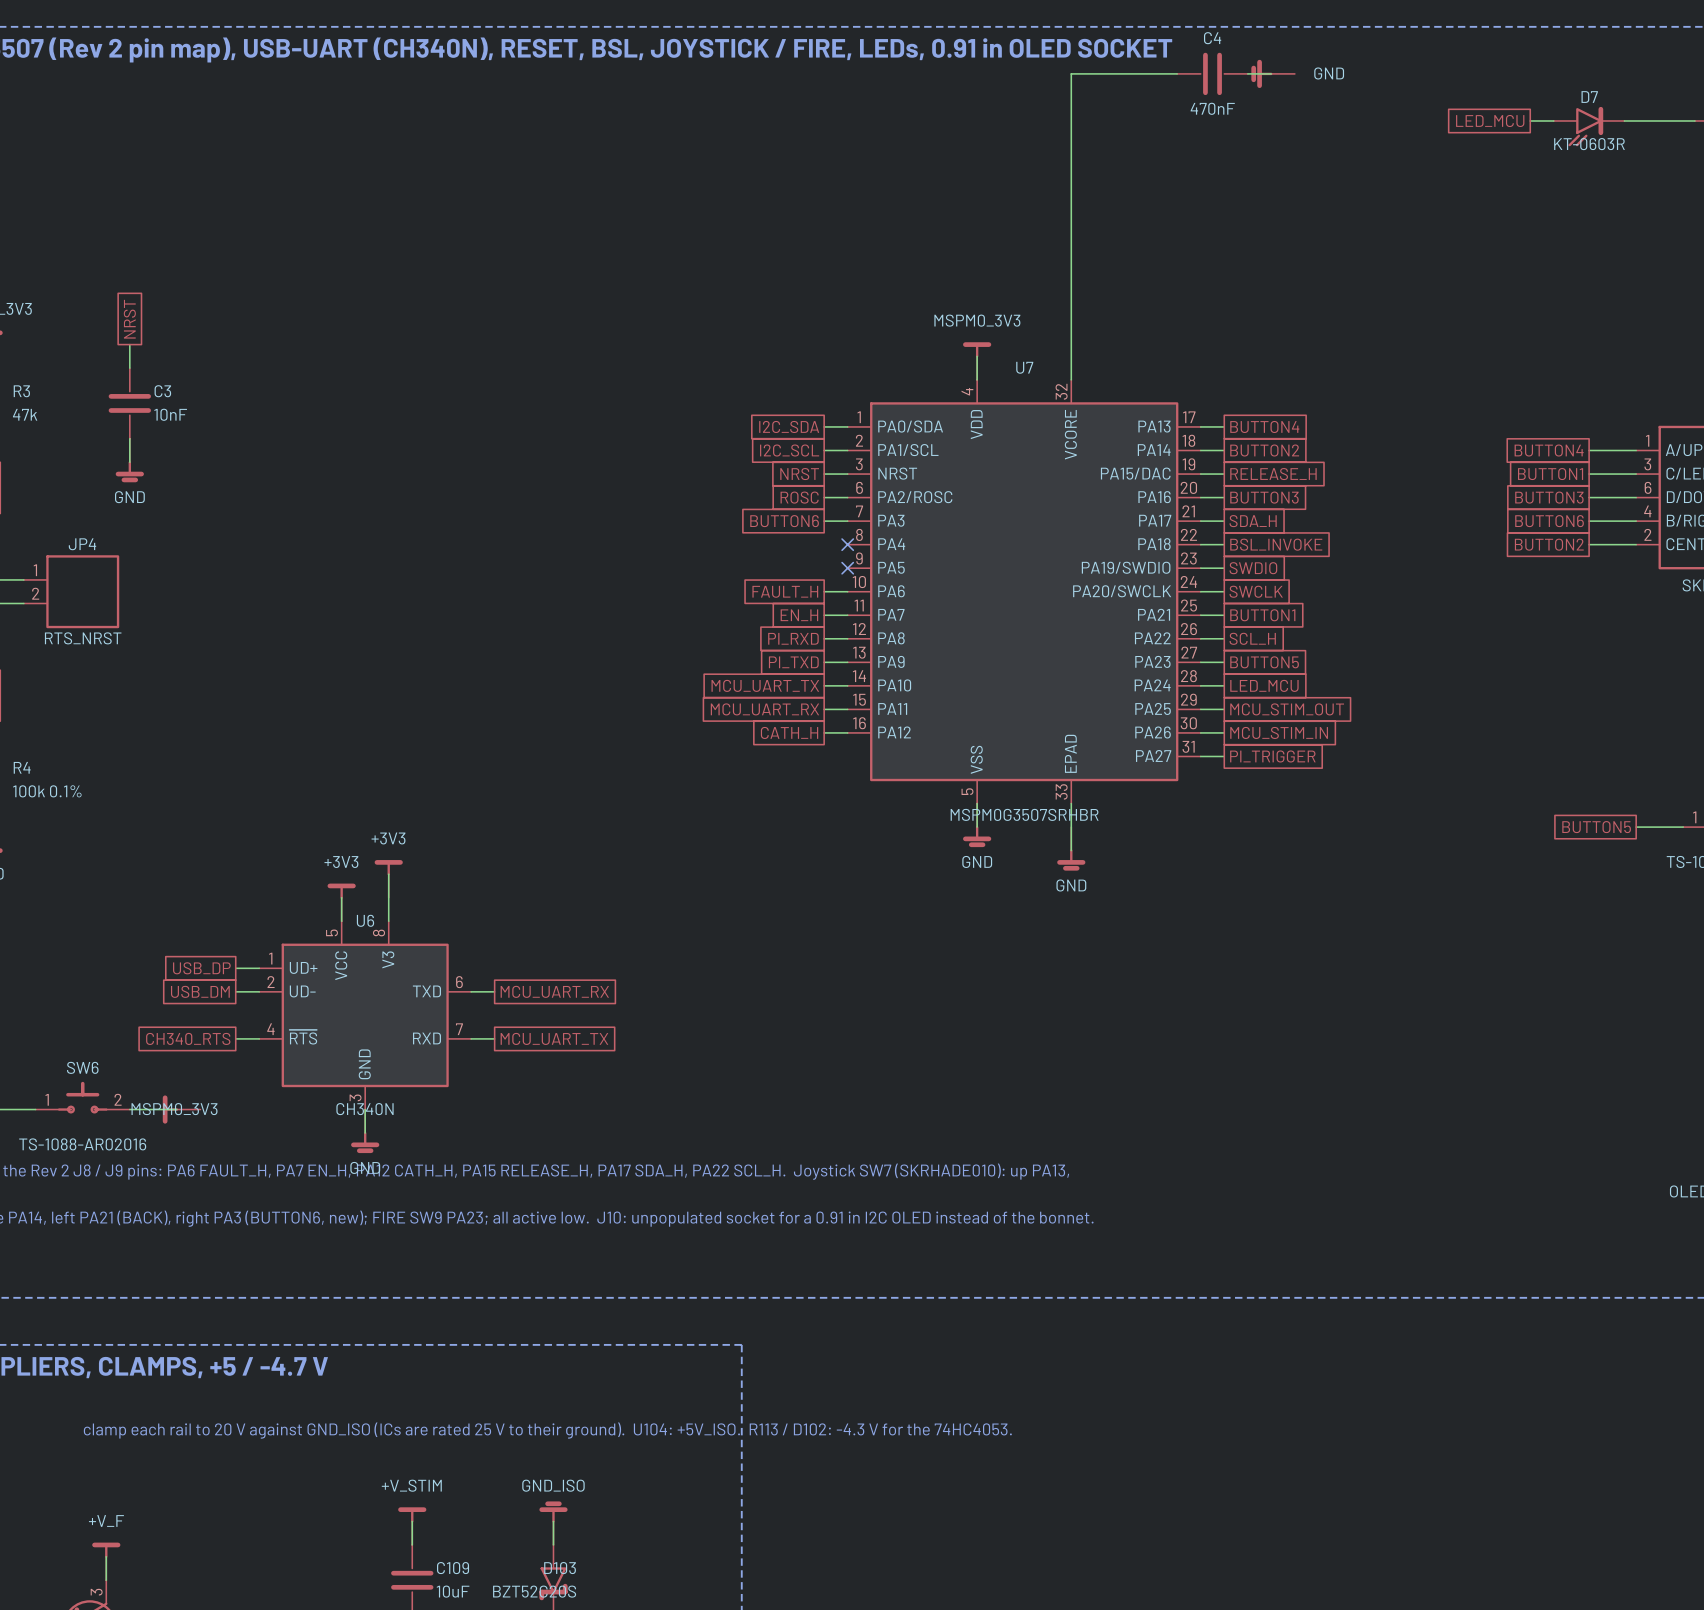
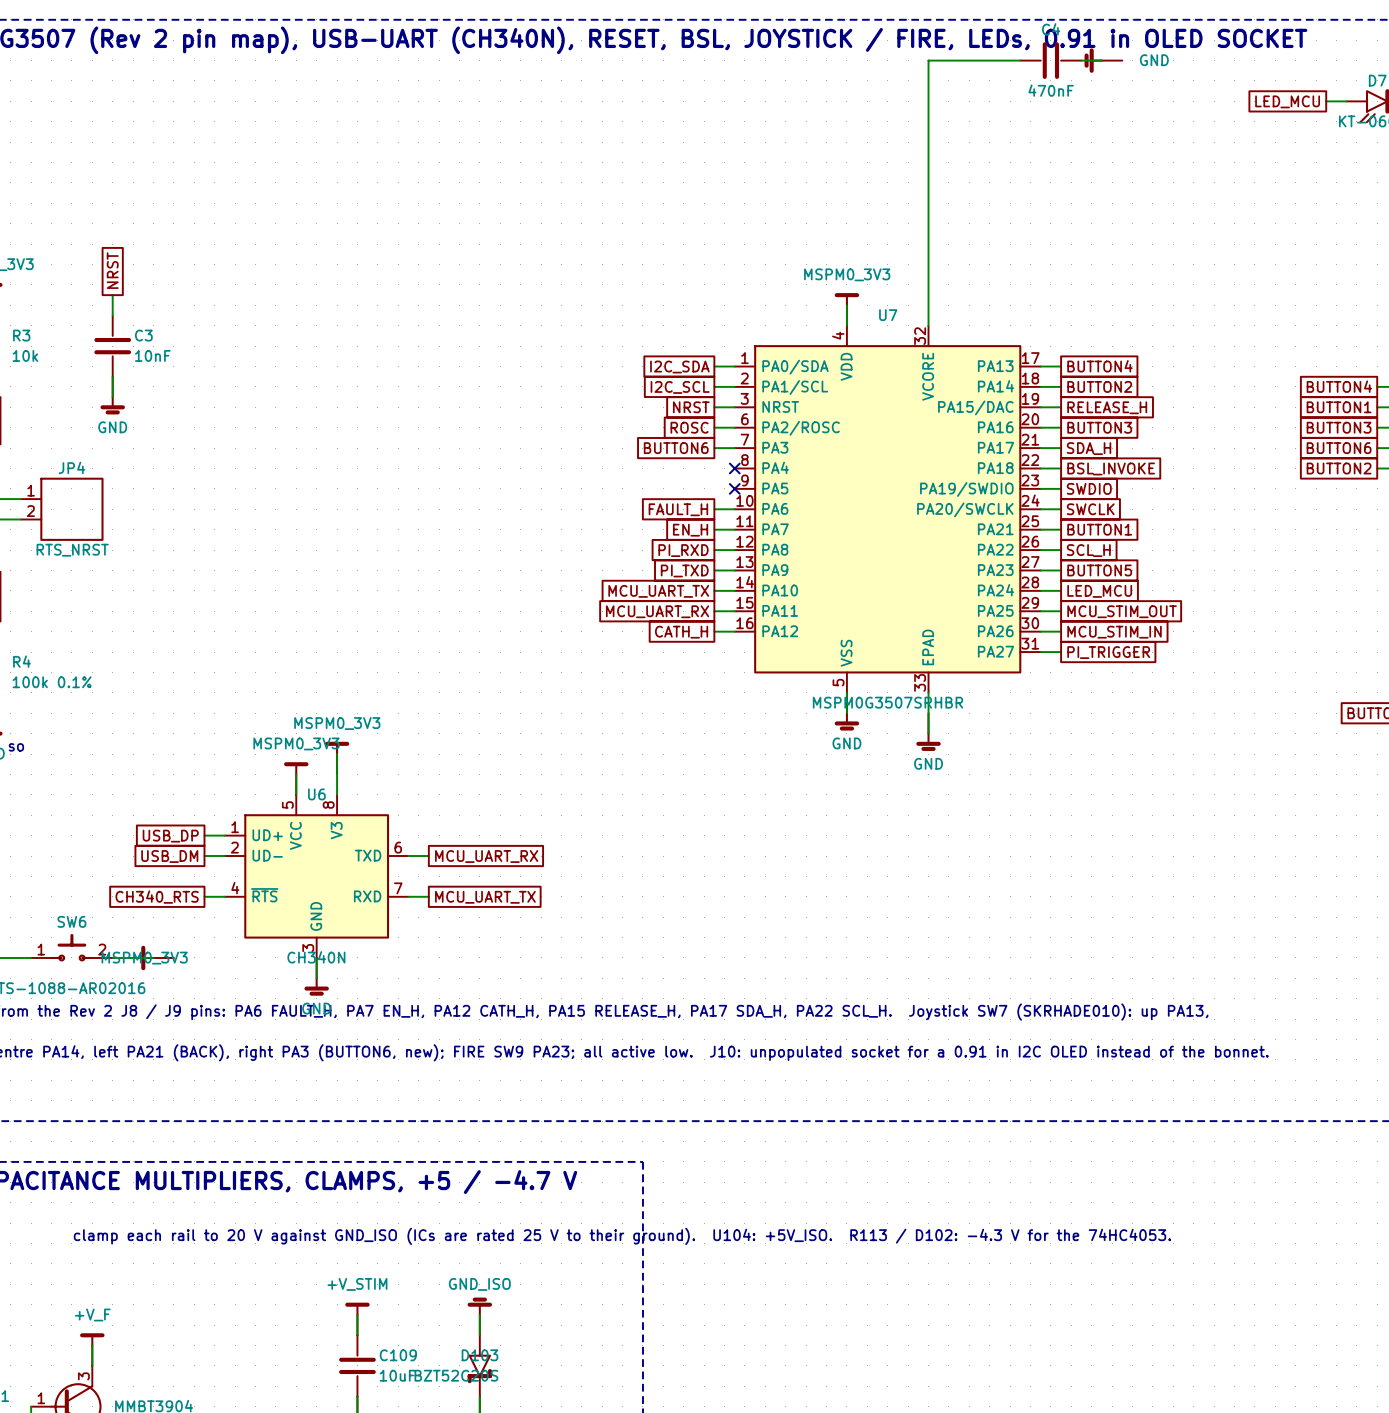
R3 value: 47k (25, 414) -> 10k (25, 355)
power symbol: +3V3 (388, 878) -> MSPM0_3V3 (337, 758)
power symbol: +3V3 (341, 902) -> MSPM0_3V3 (296, 778)

